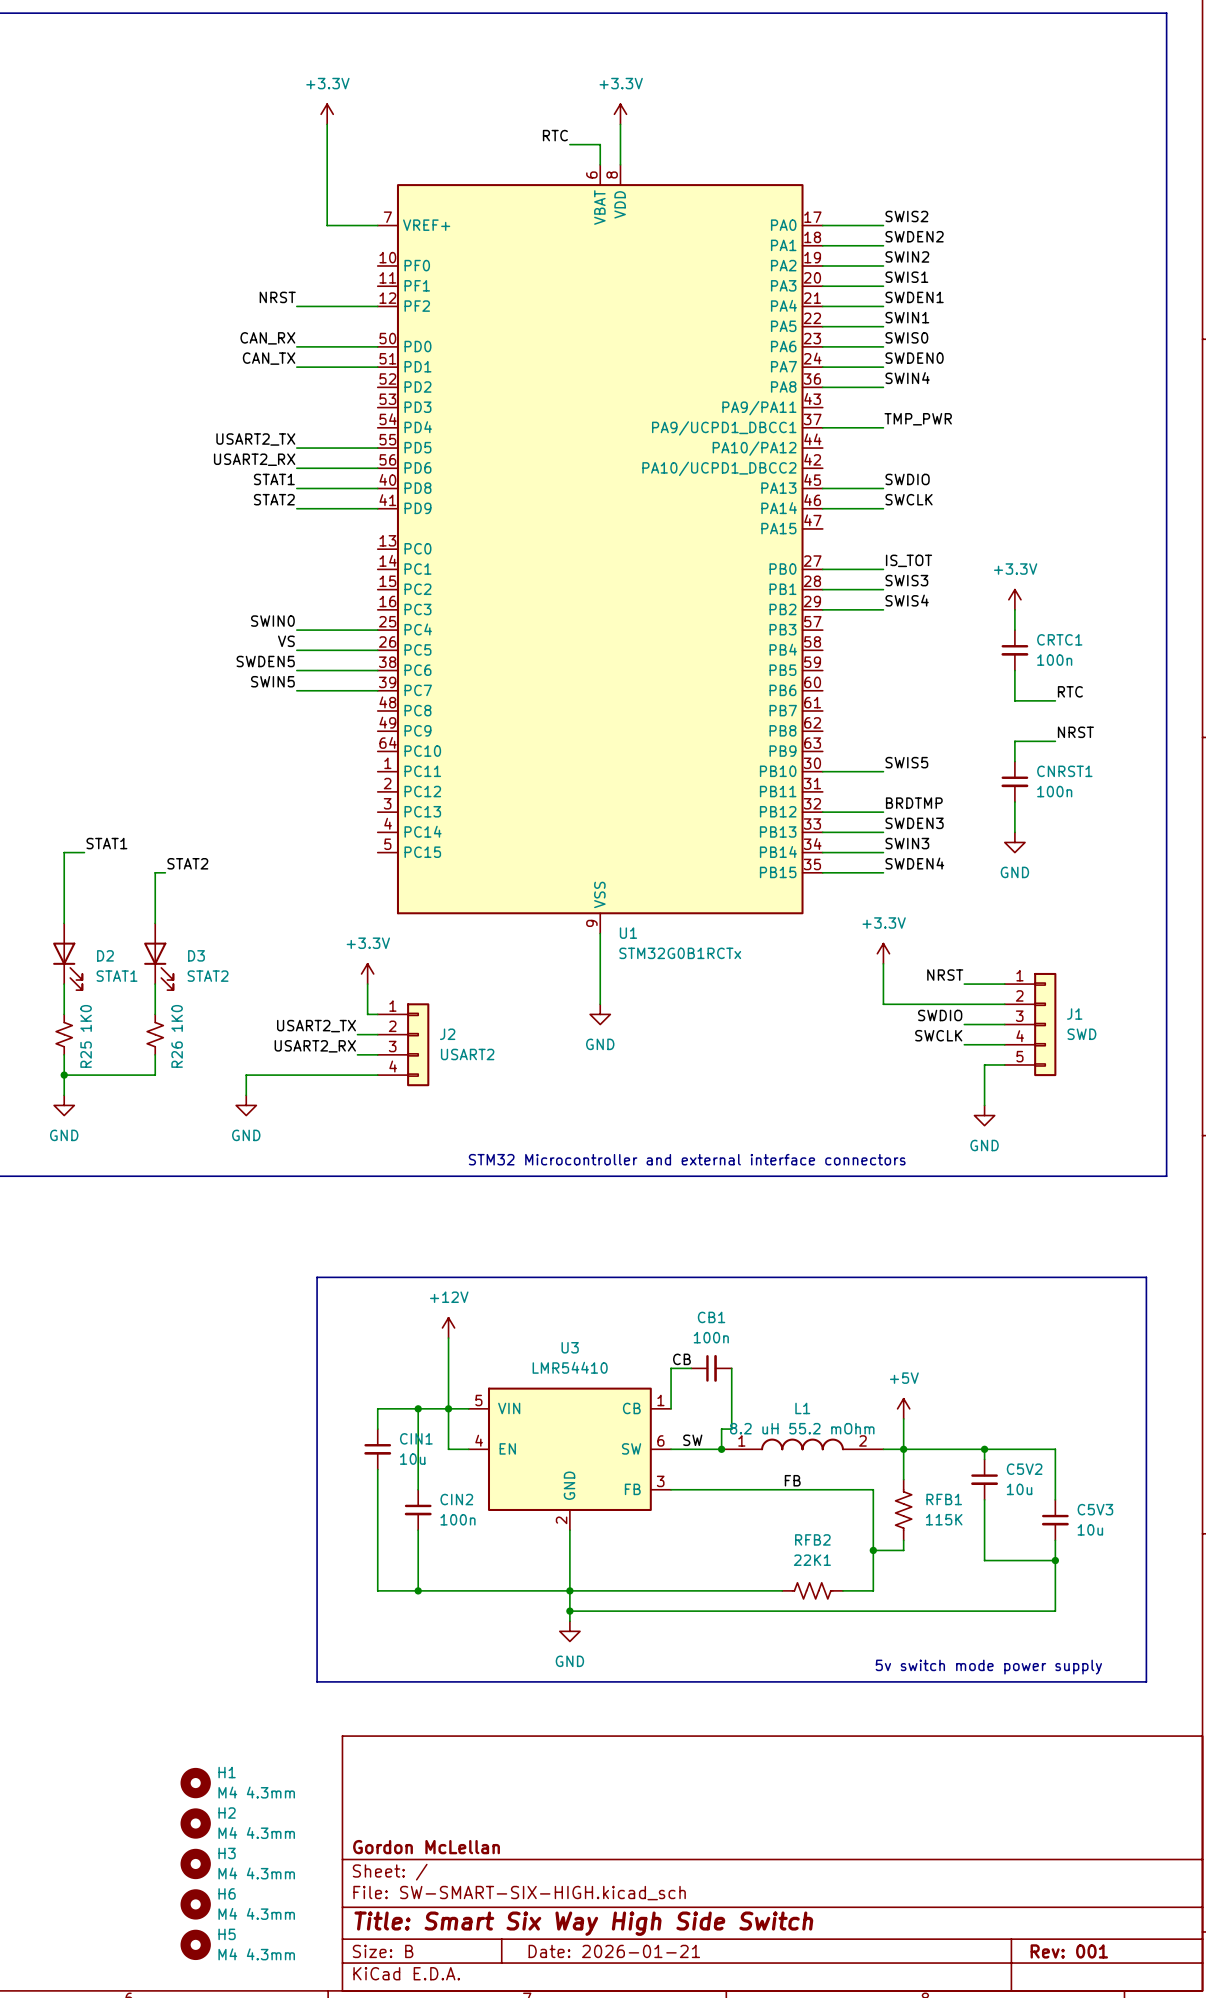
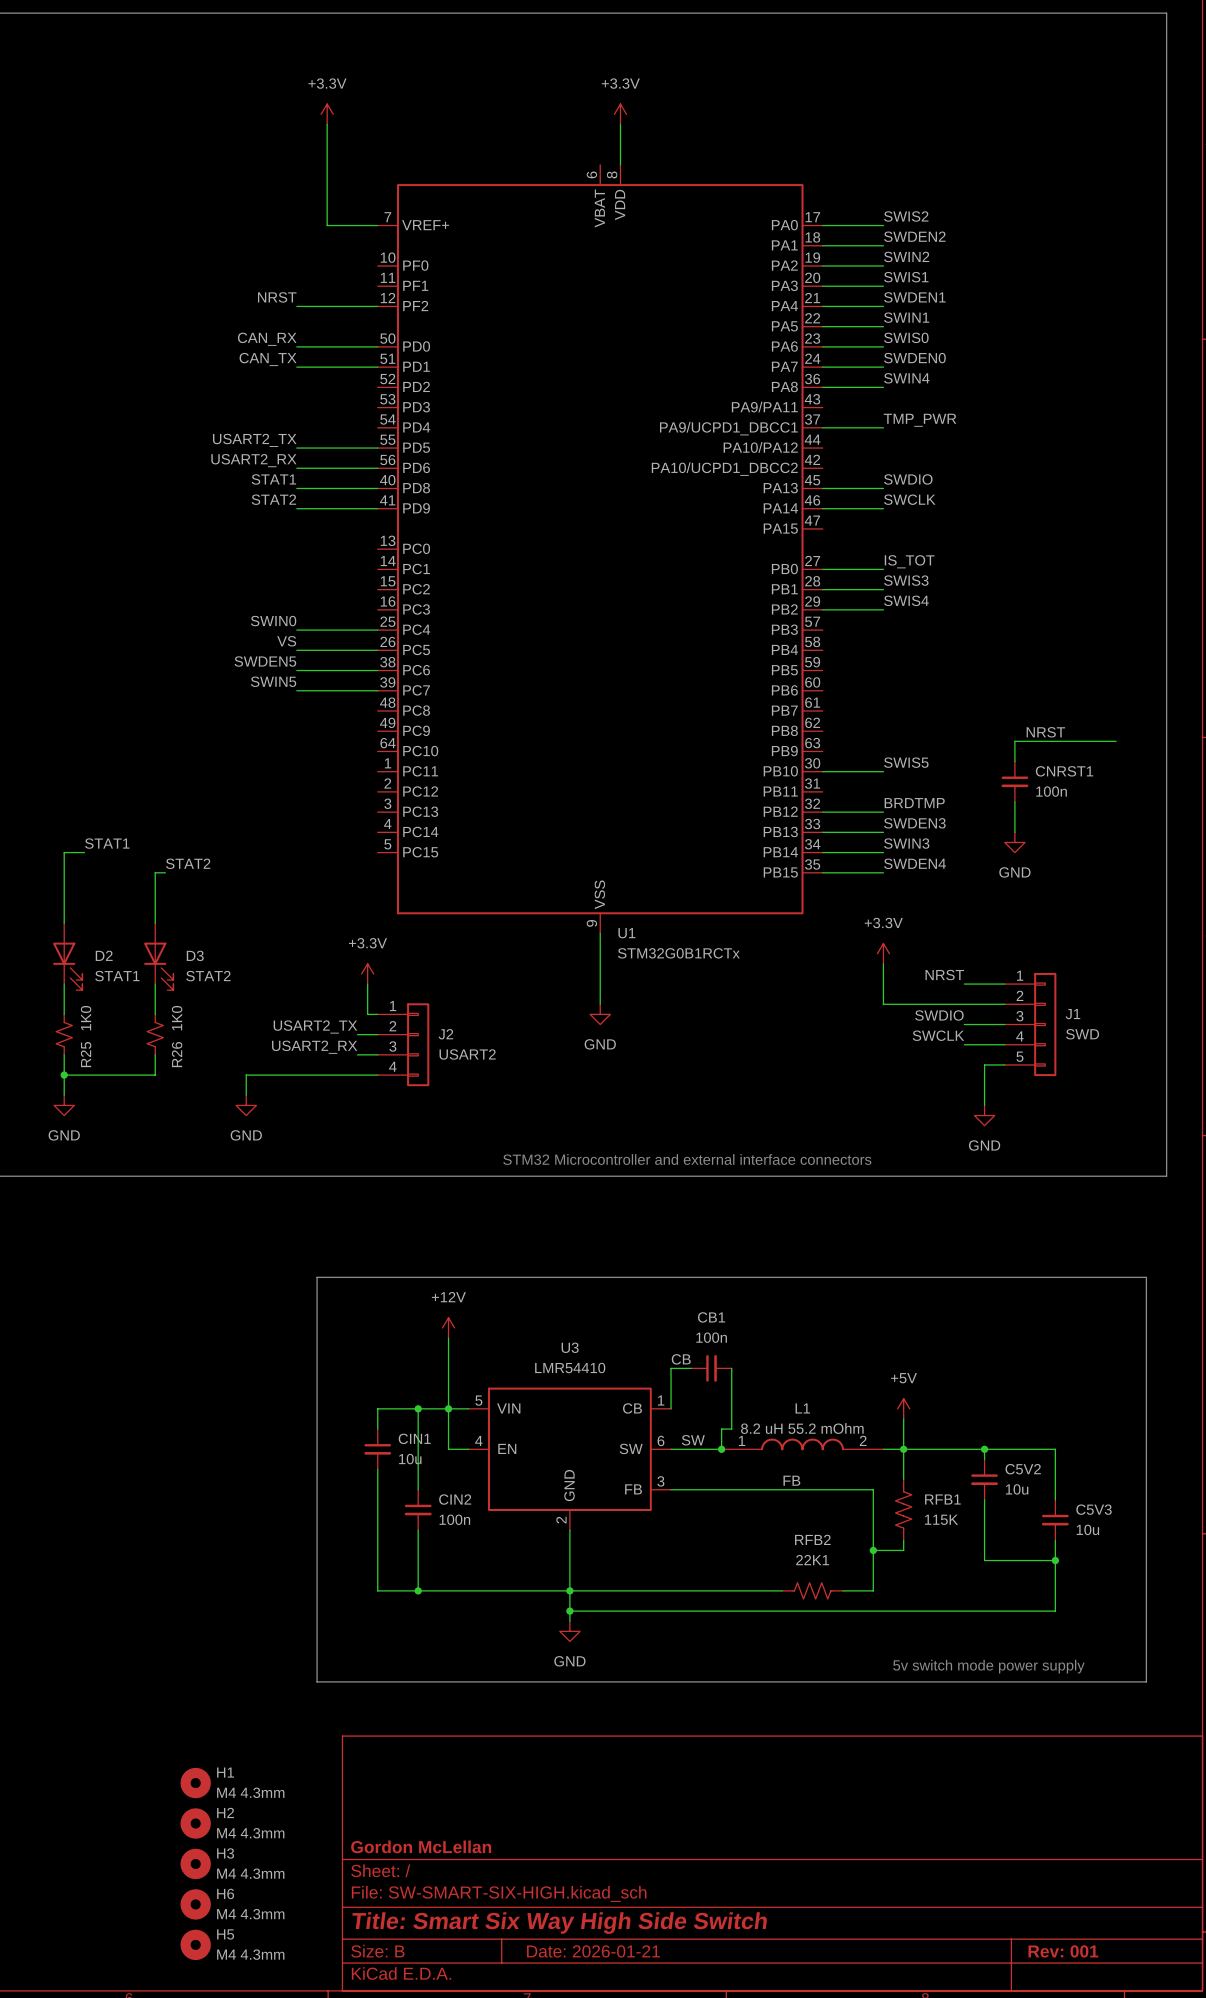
label: RTC (555, 135) -> none
wire: (569, 144) (600, 144) (600, 164) -> none
power symbol: +3.3V (1014, 599) -> none
wire: (1014, 609) (1014, 630) -> none
CRTC1: 100n (1014, 650) -> none
wire: (1014, 670) (1014, 700) (1055, 700) -> none
label: RTC (1070, 691) -> none
label position: NRST (1075, 732) -> NRST (1045, 732)
wire: none -> (1055, 741) (1116, 741)

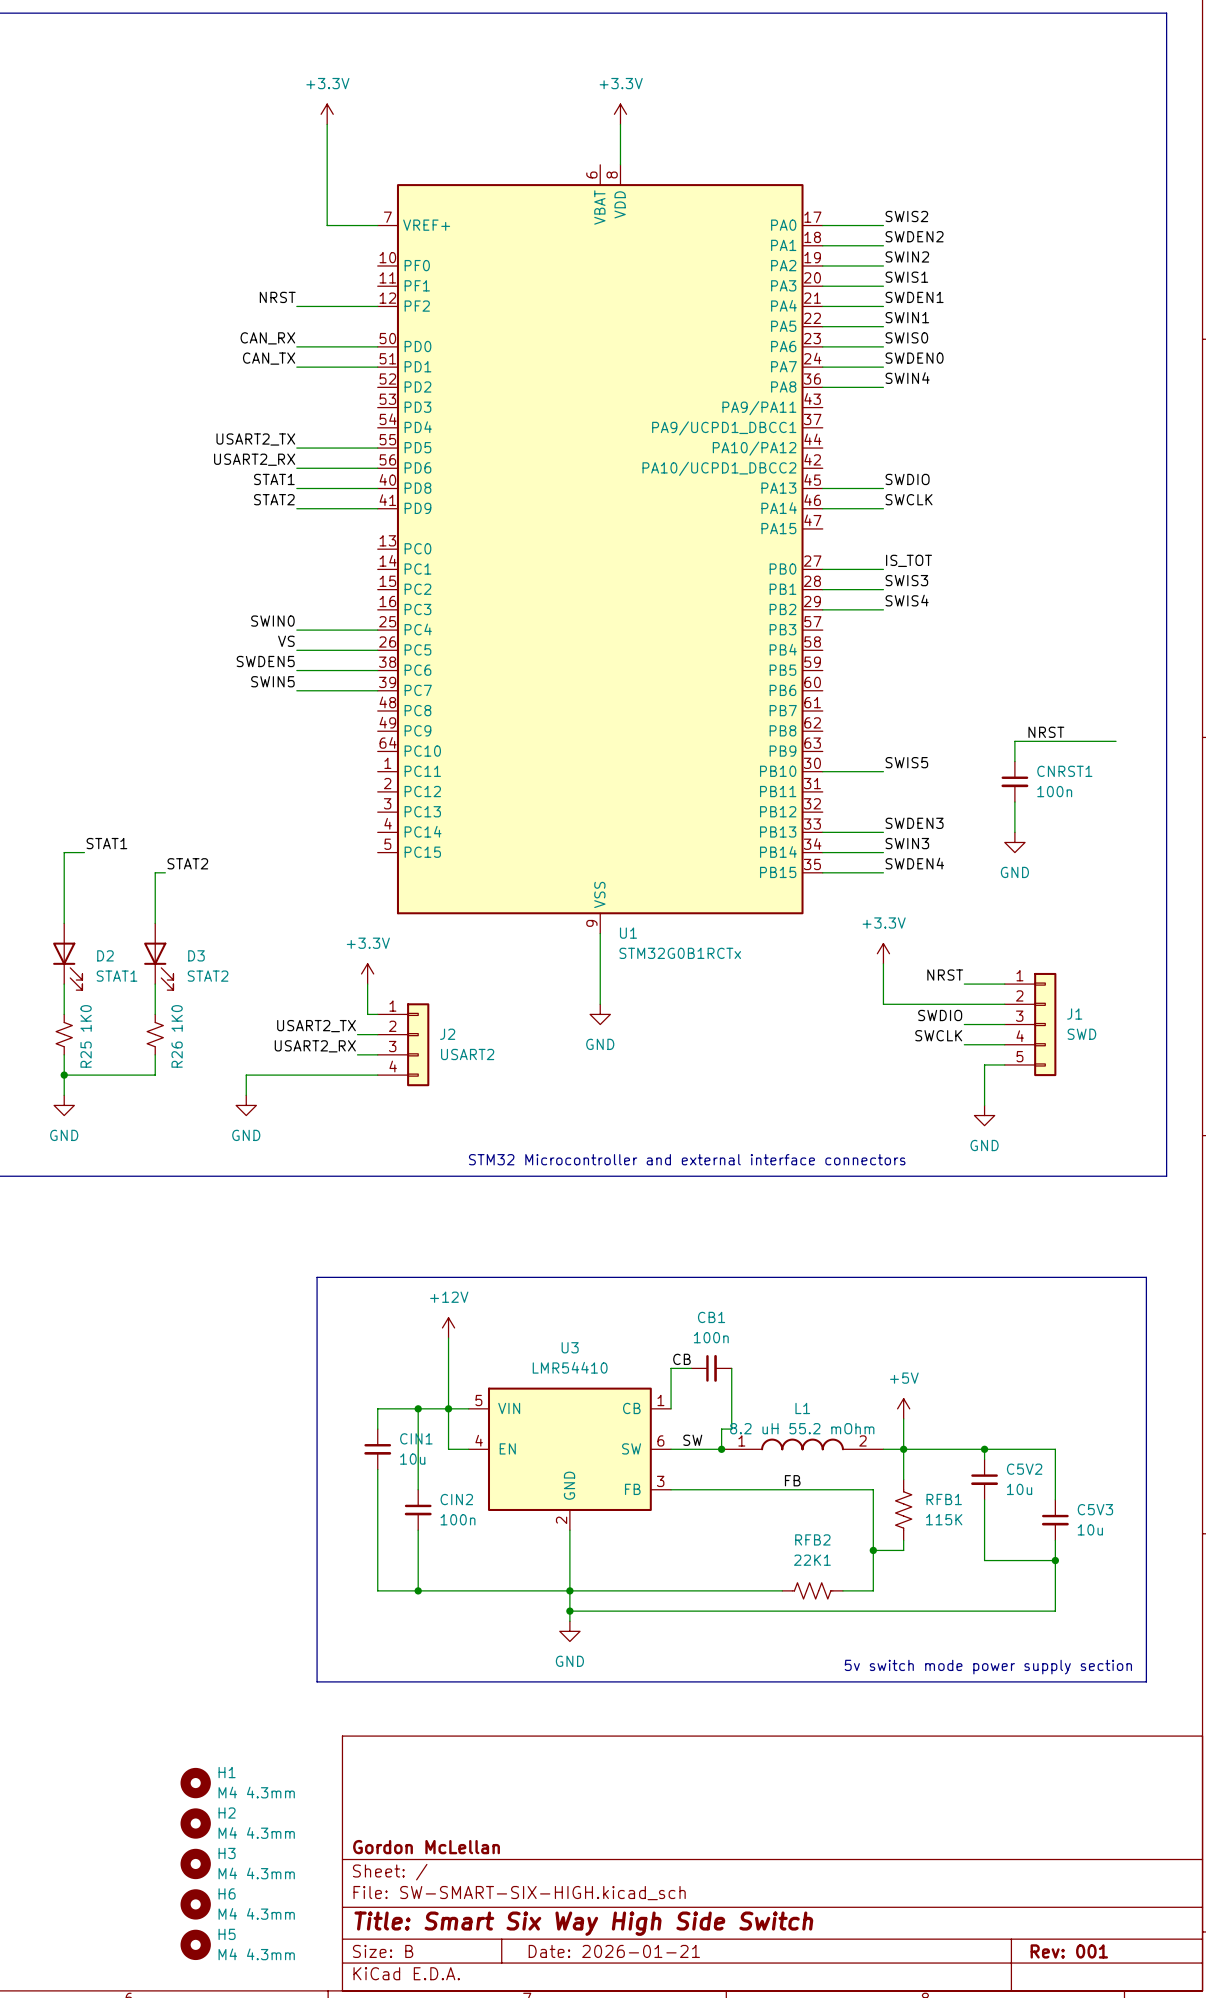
label: TMP_PWR (920, 420) -> none
wire: (822, 427) (883, 427) -> none
label: BRDTMP (914, 803) -> none
wire: (822, 812) (883, 812) -> none
text: 5v switch mode power supply (988, 1666) -> 5v switch mode power supply section (988, 1667)

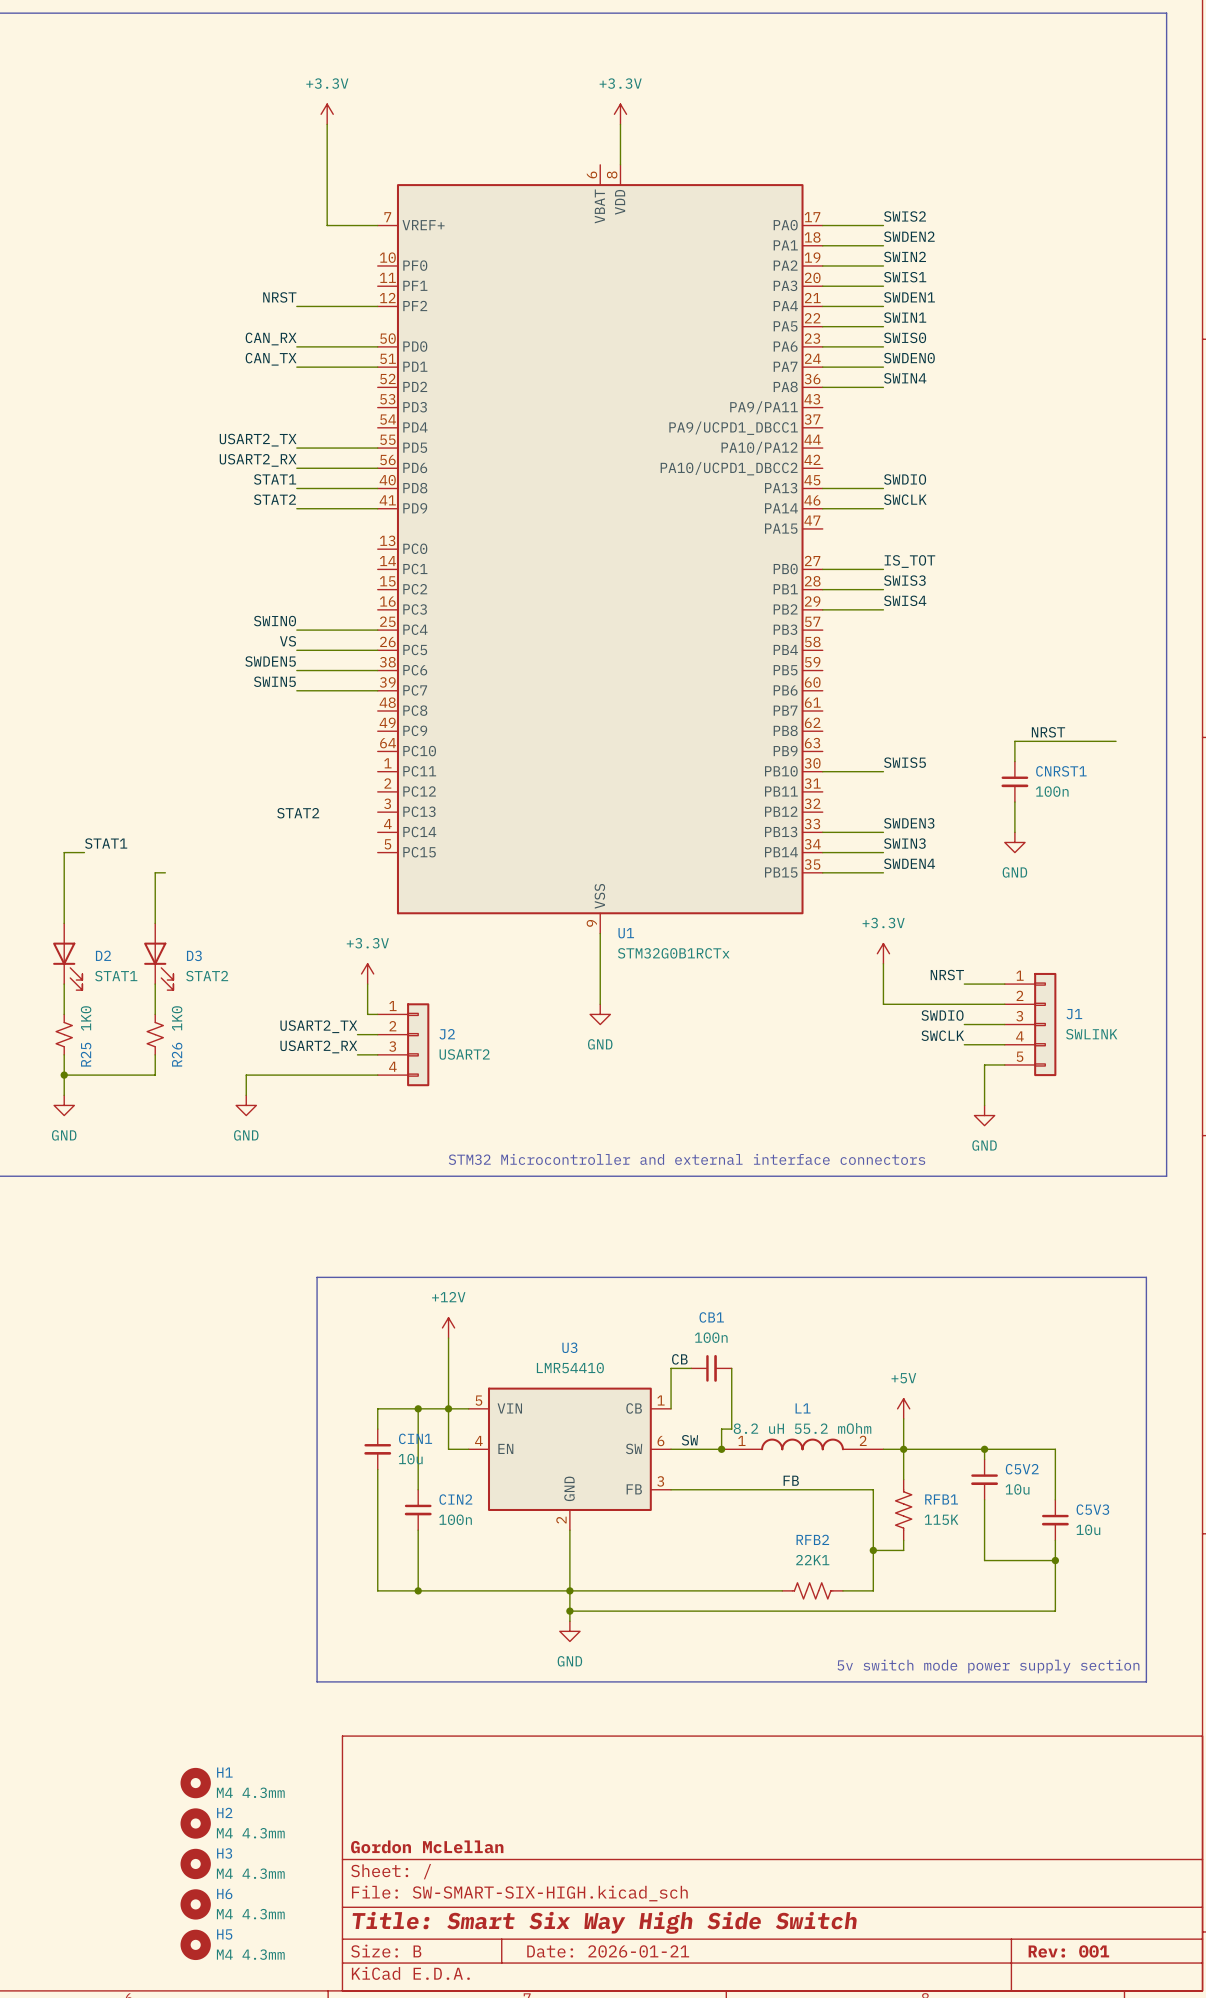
label position: STAT2 (187, 863) -> STAT2 (298, 813)
J1 value: SWD (1081, 1034) -> SWLINK (1091, 1034)

